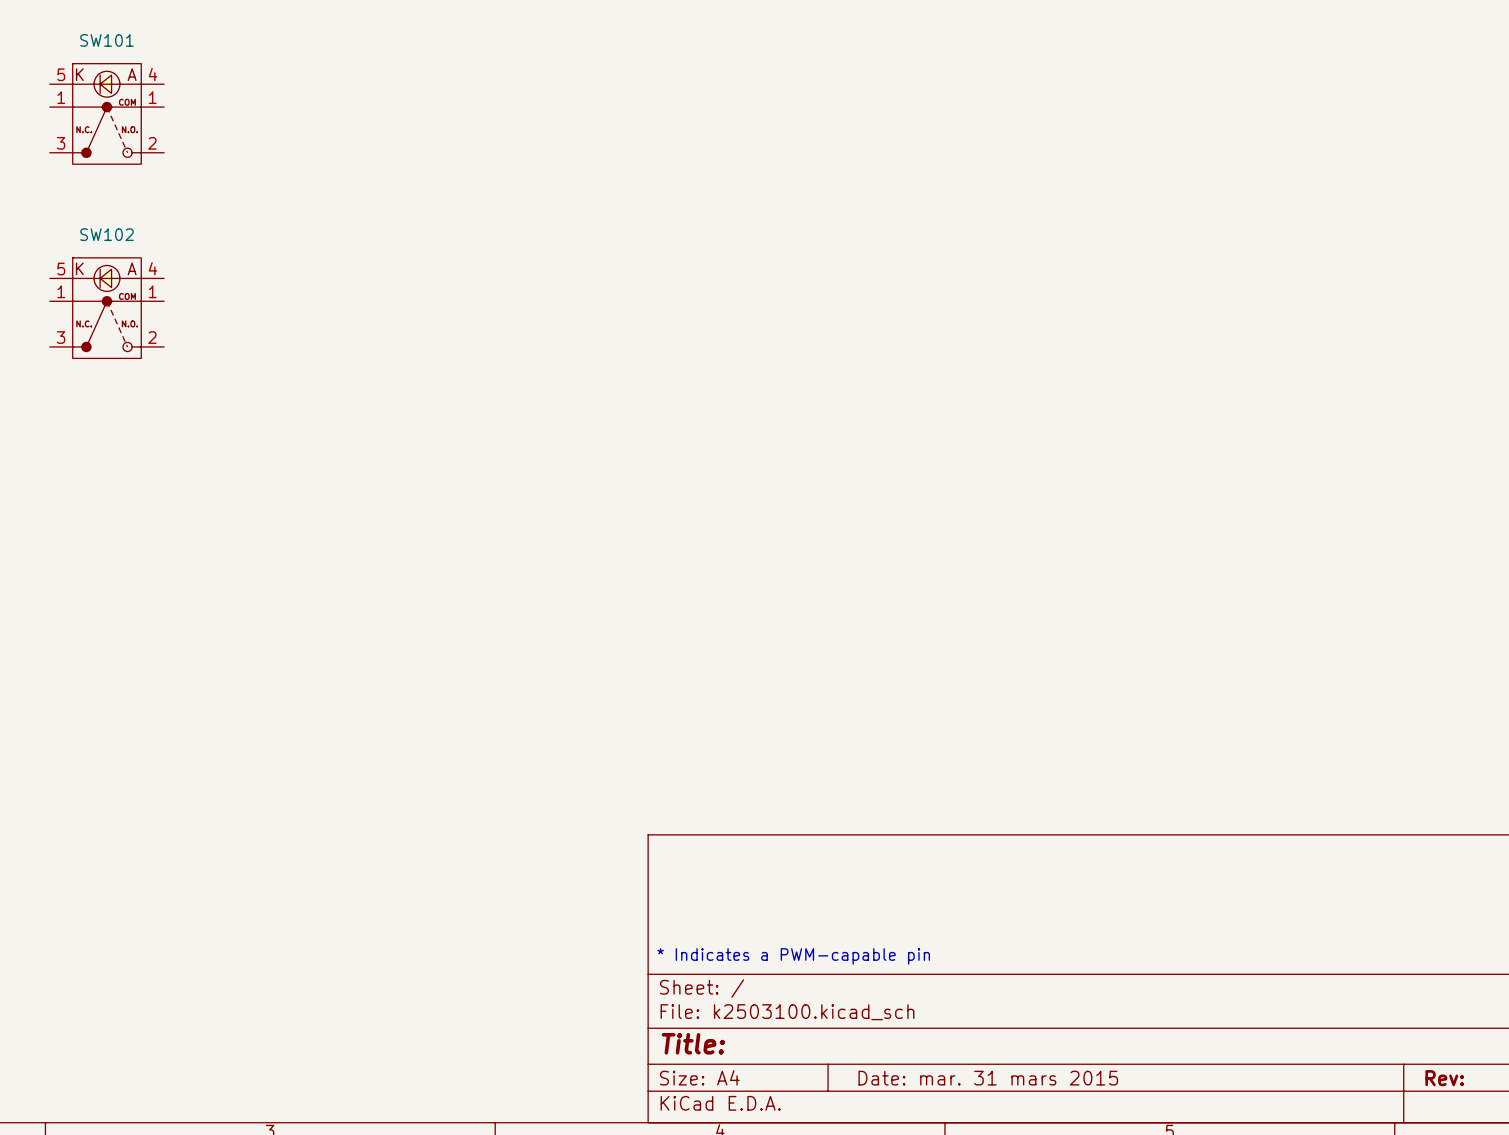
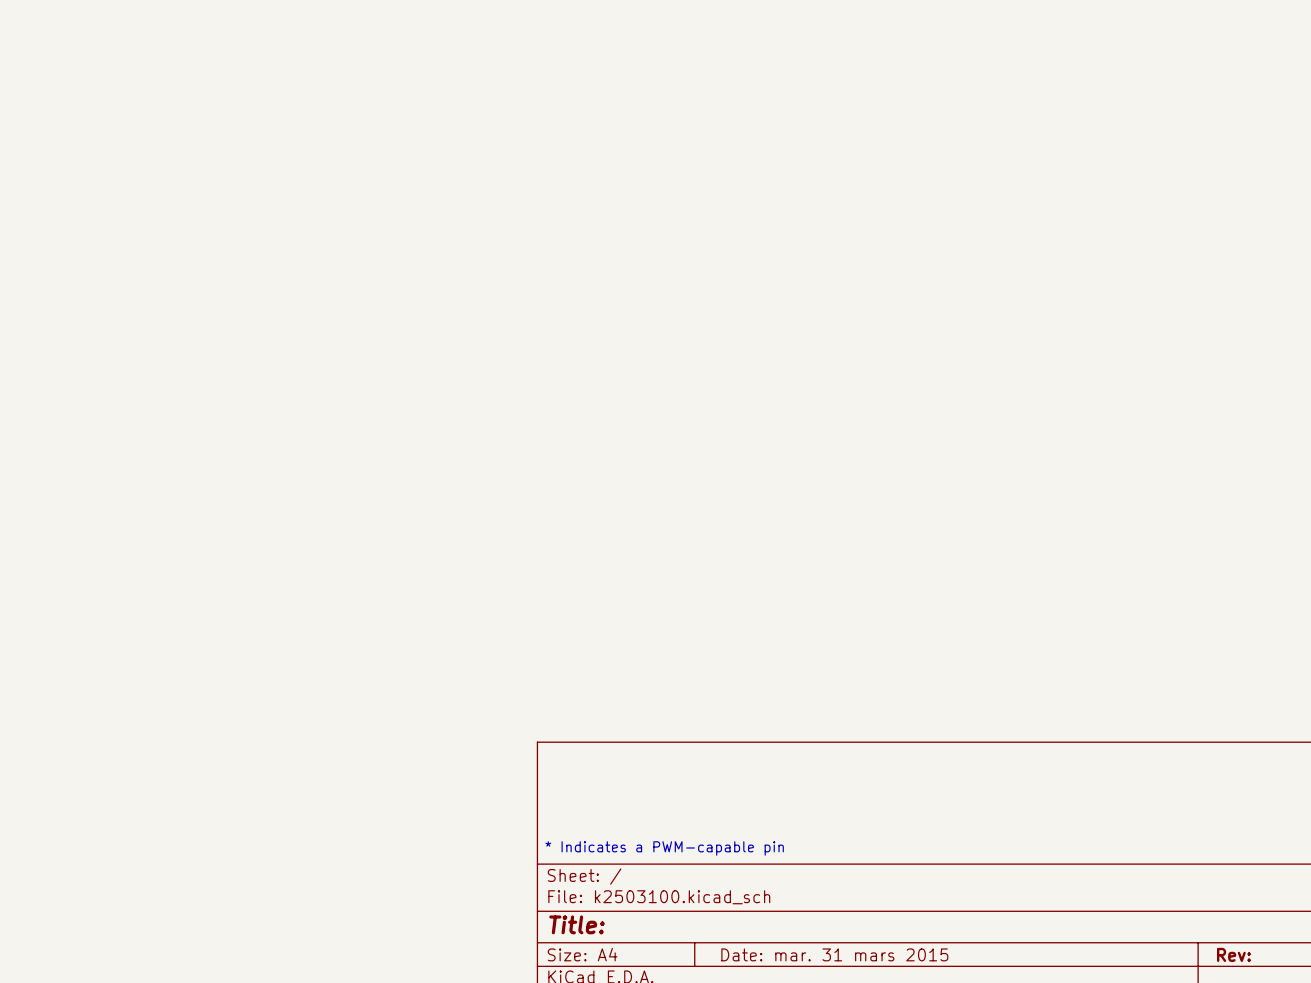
SW101: (106, 113) -> none
SW102: (106, 308) -> none

